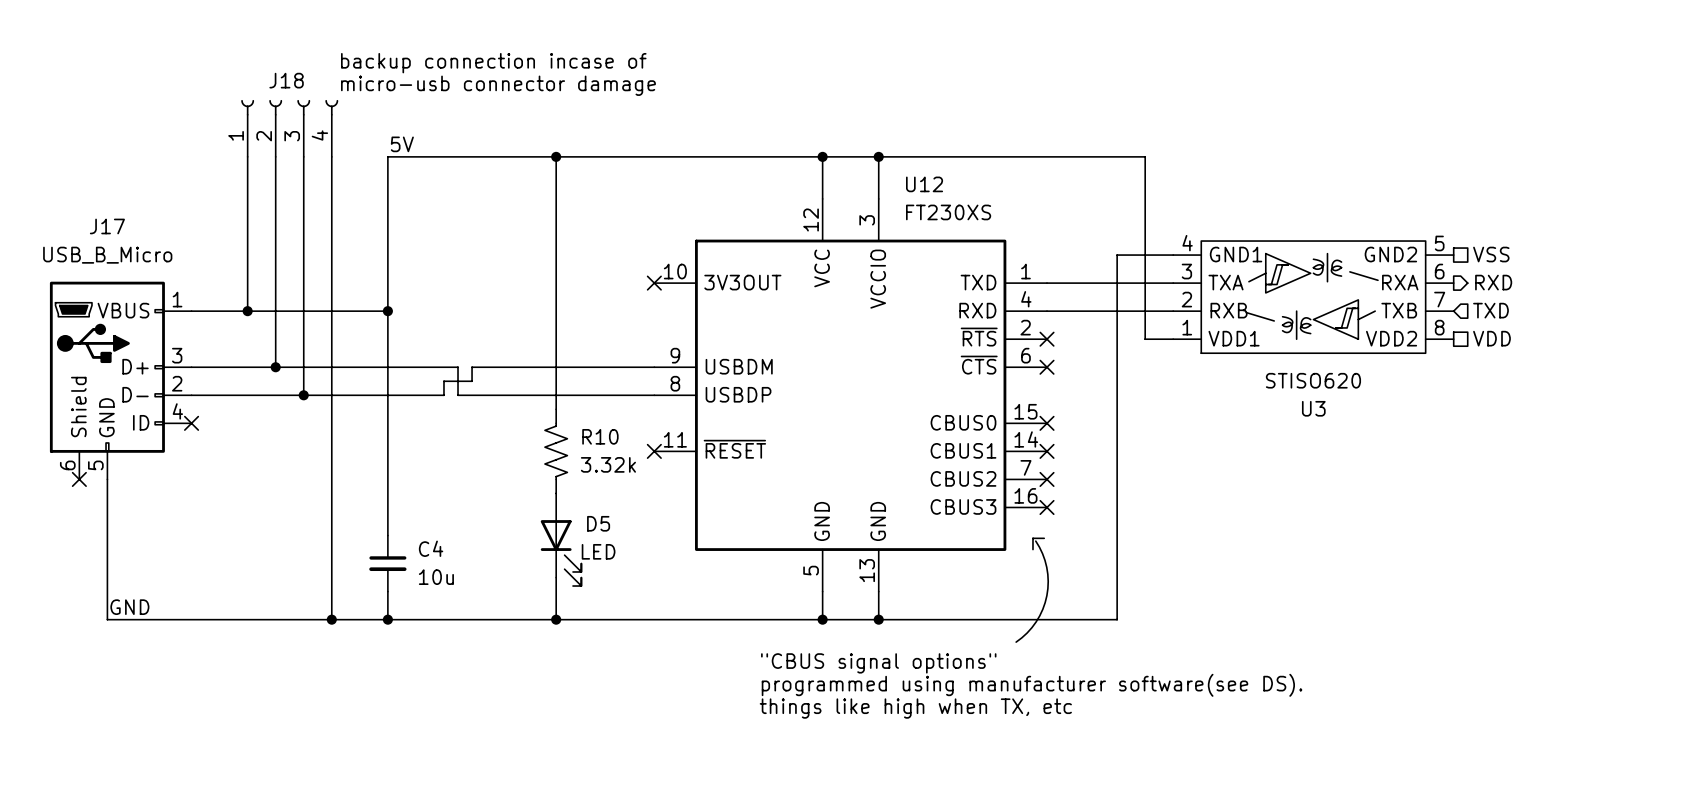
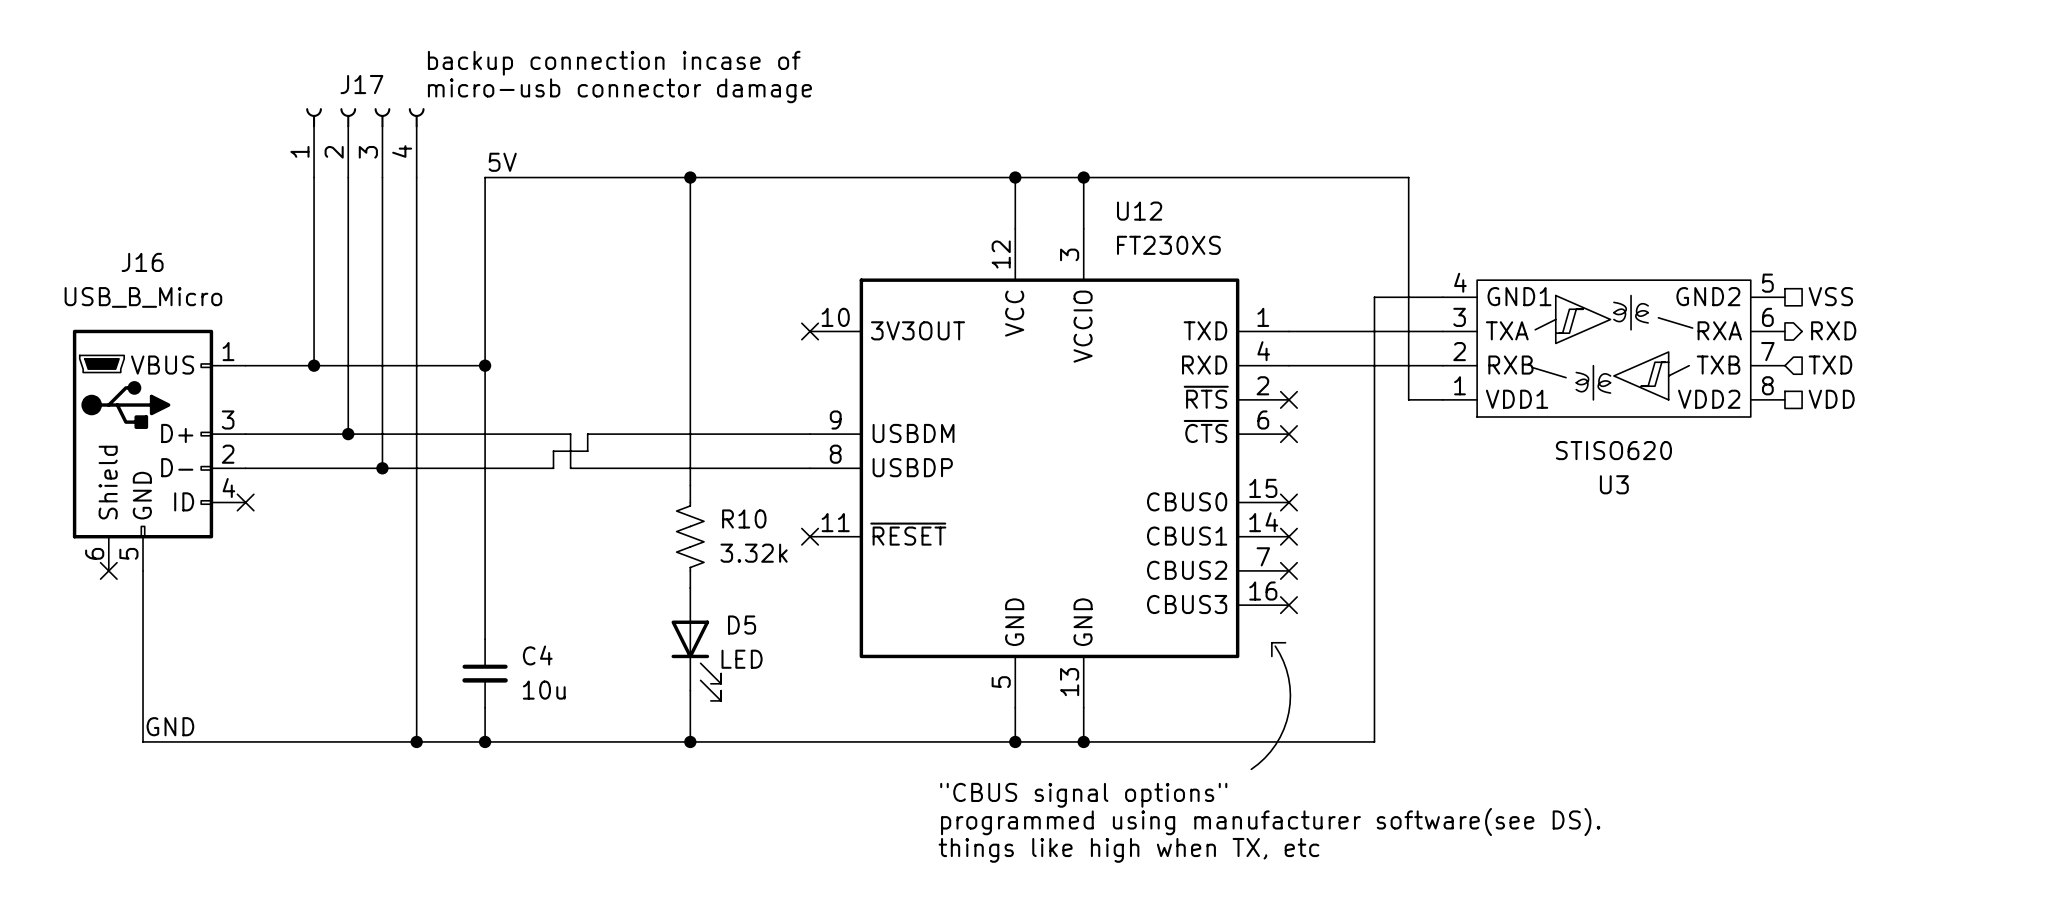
J18 name: J18 (286, 80) -> J17 (361, 84)
J17 name: J17 (107, 226) -> J16 (142, 262)

